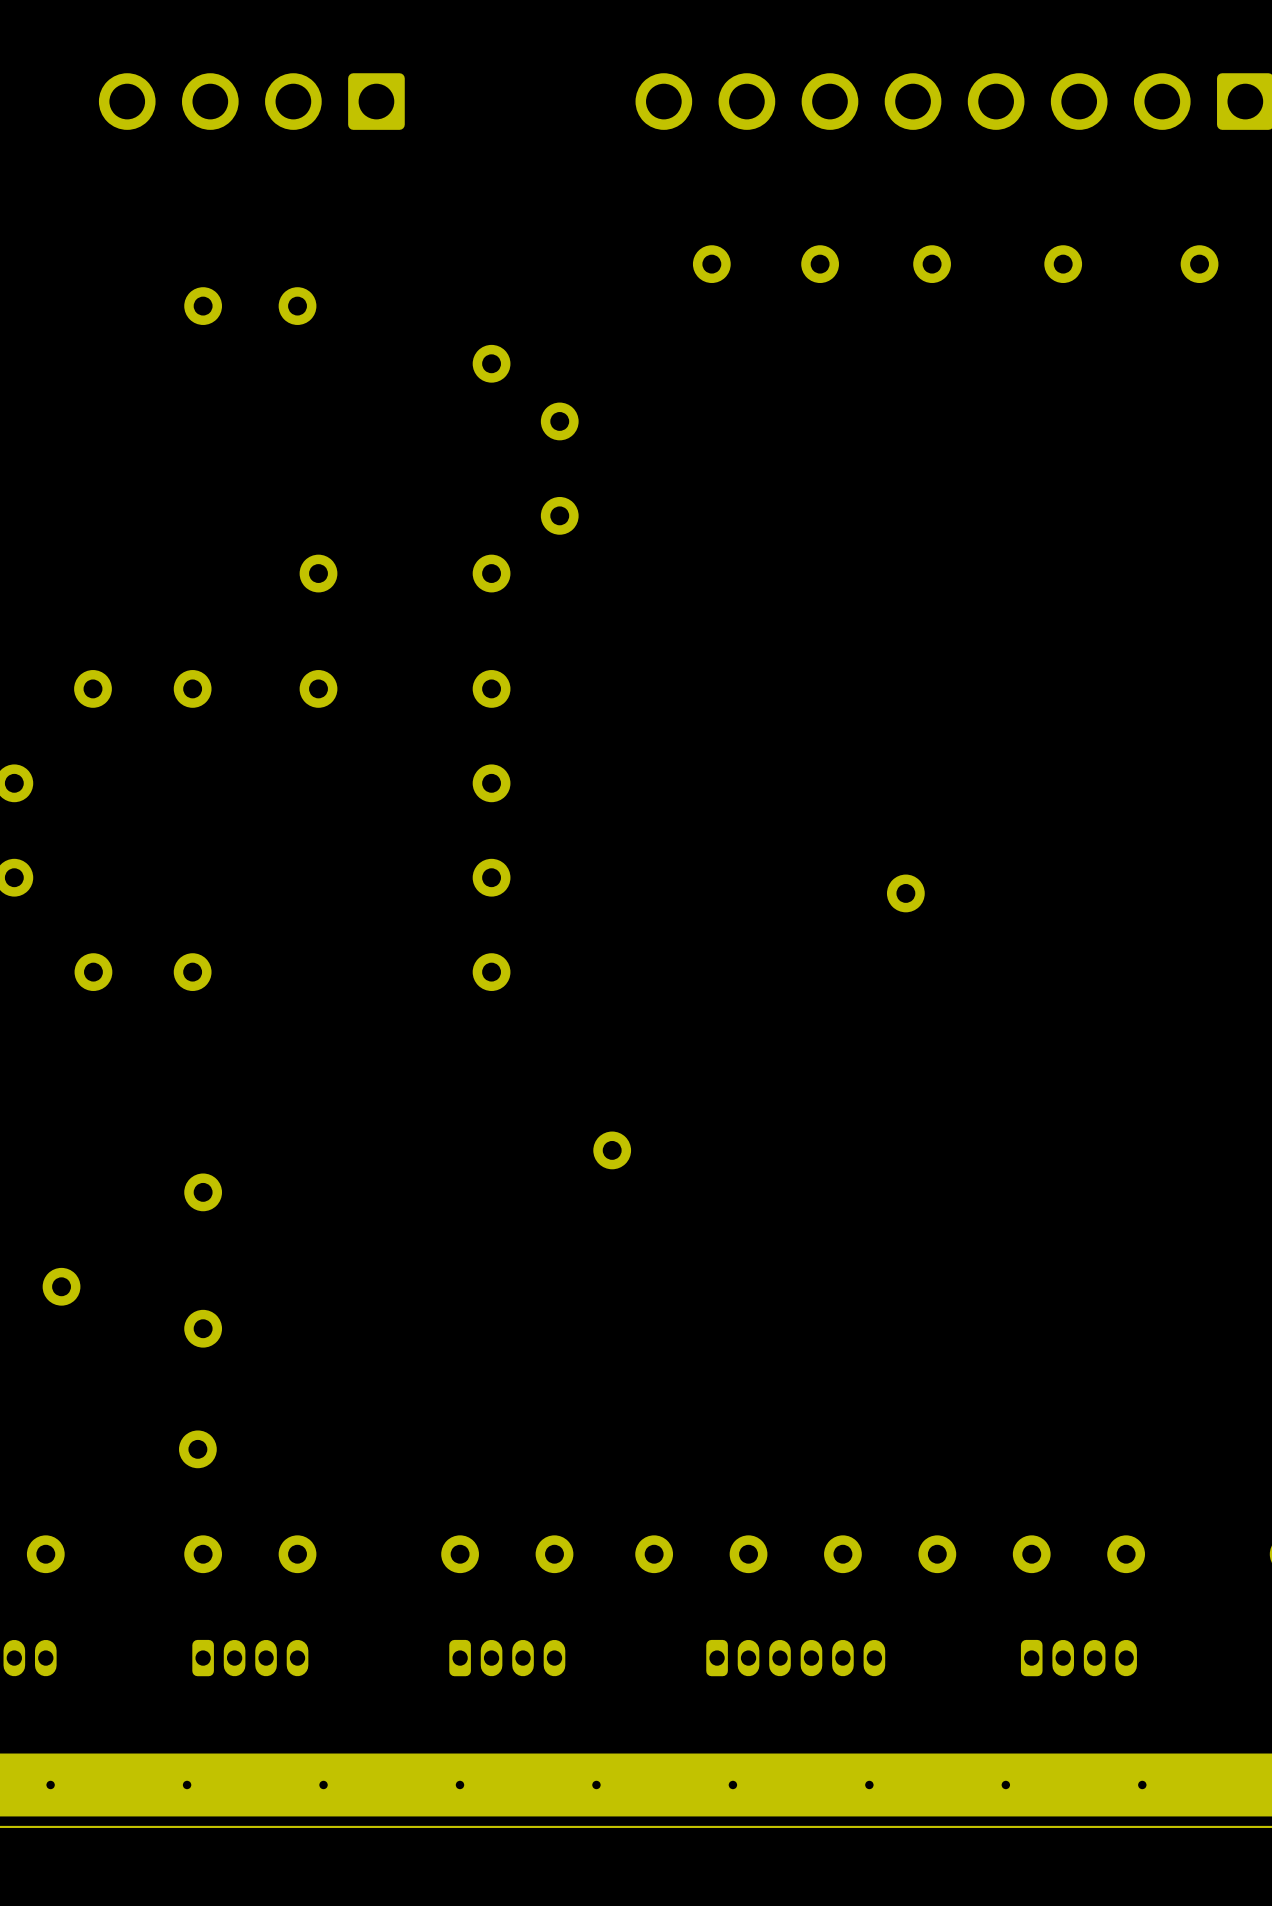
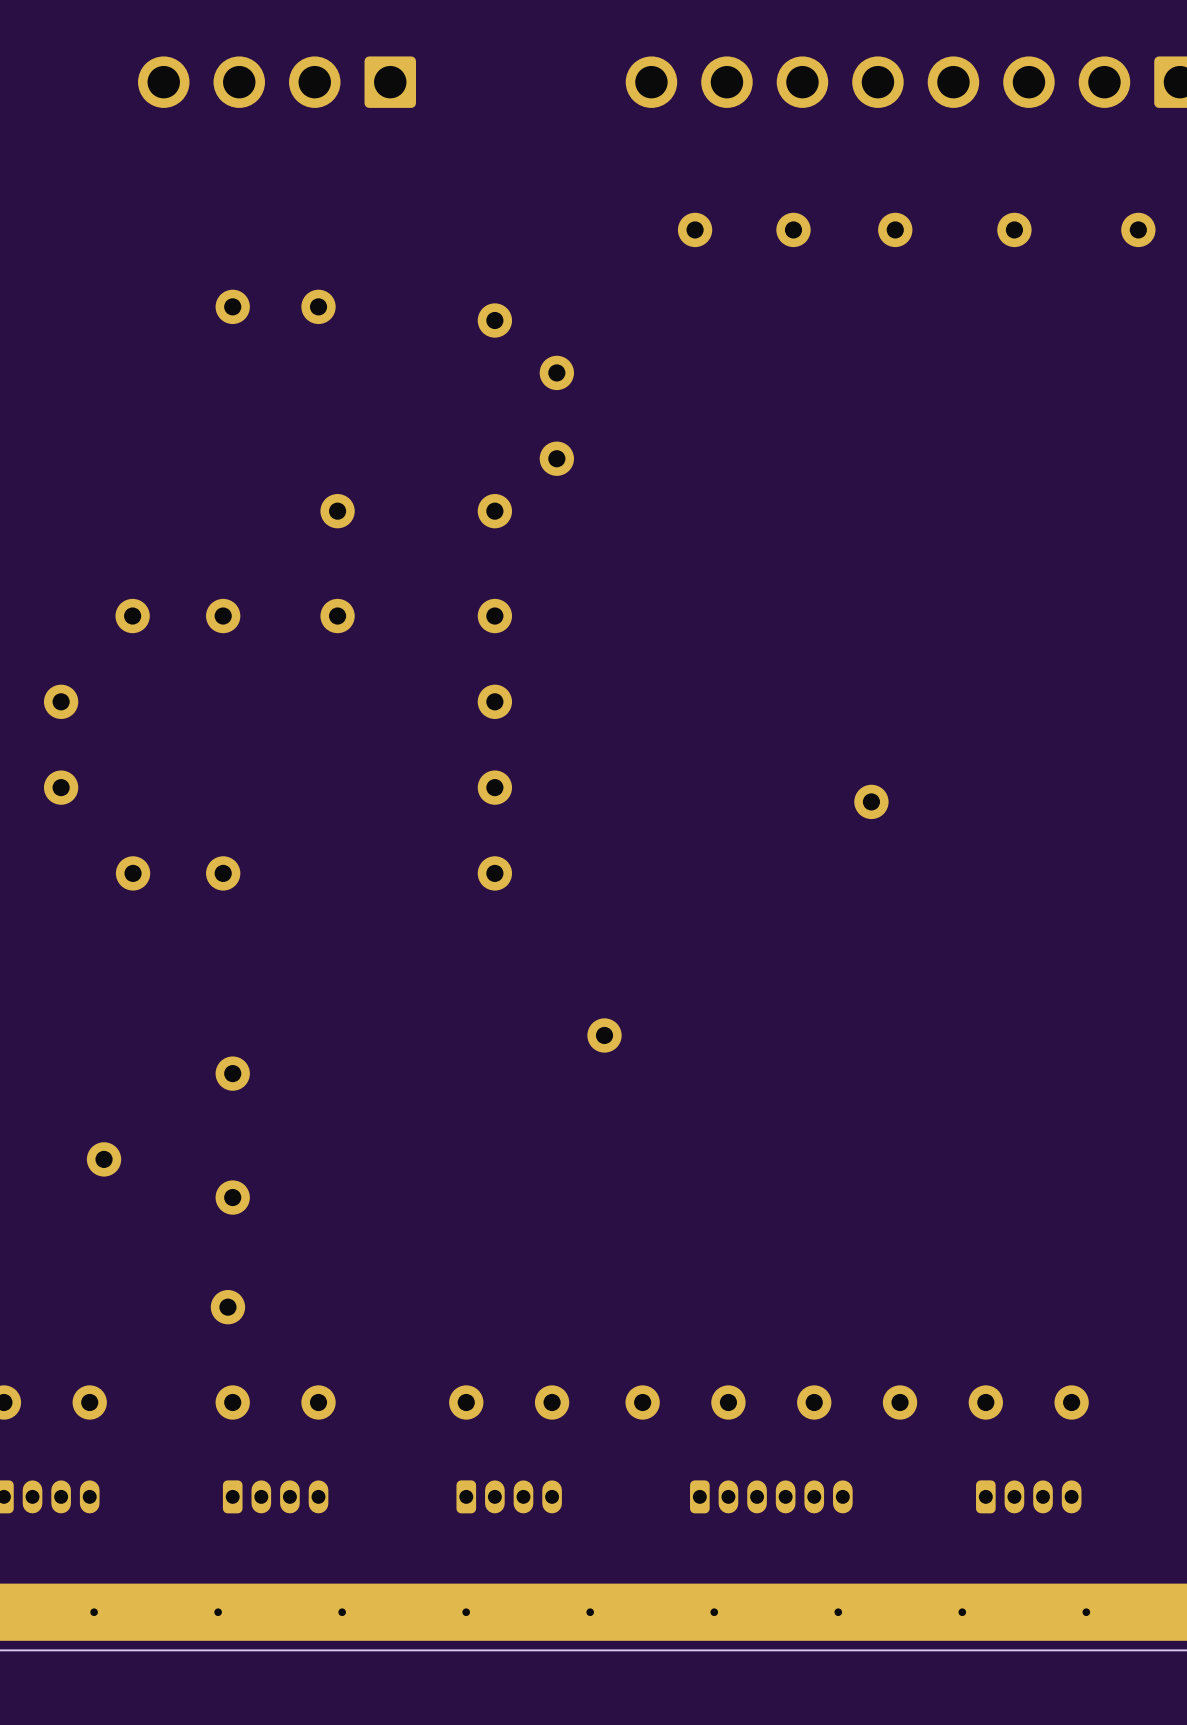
part position: (203, 306) -> (232, 306)
part position: (297, 306) -> (318, 306)

